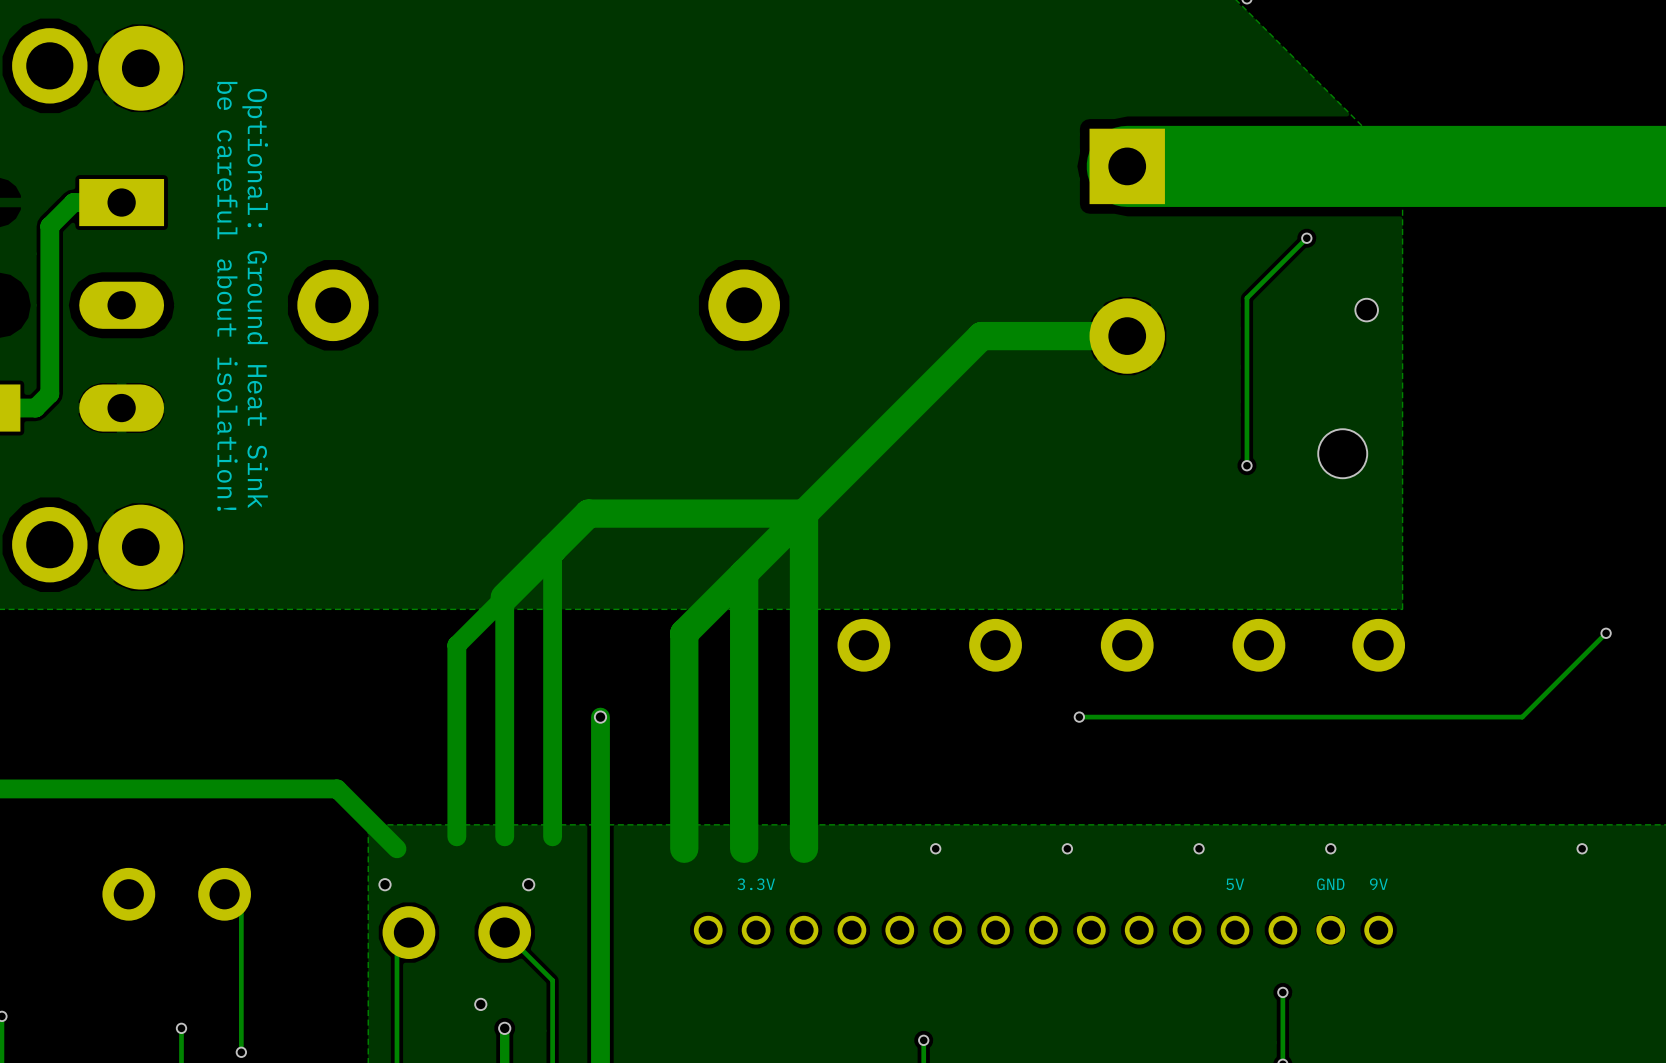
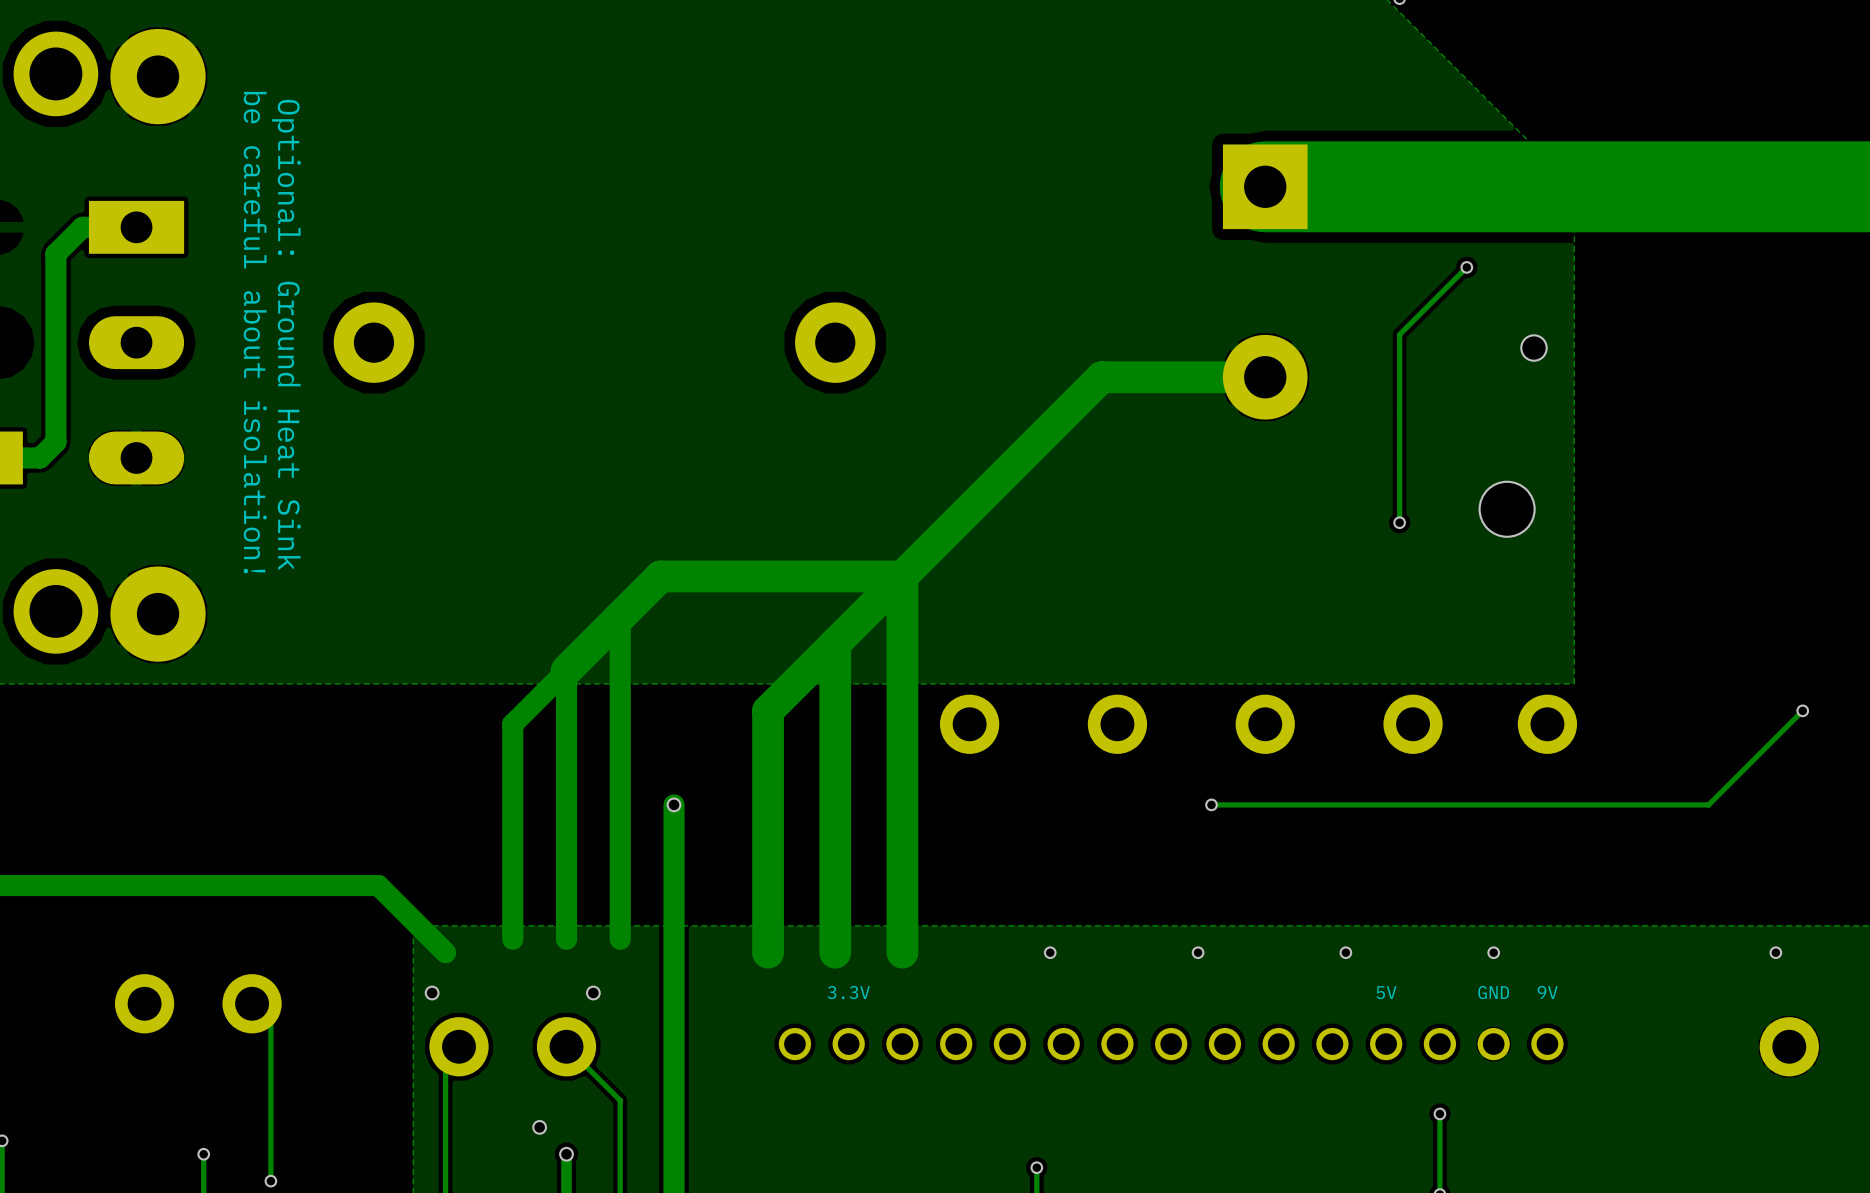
part: none -> (1789, 1046)

